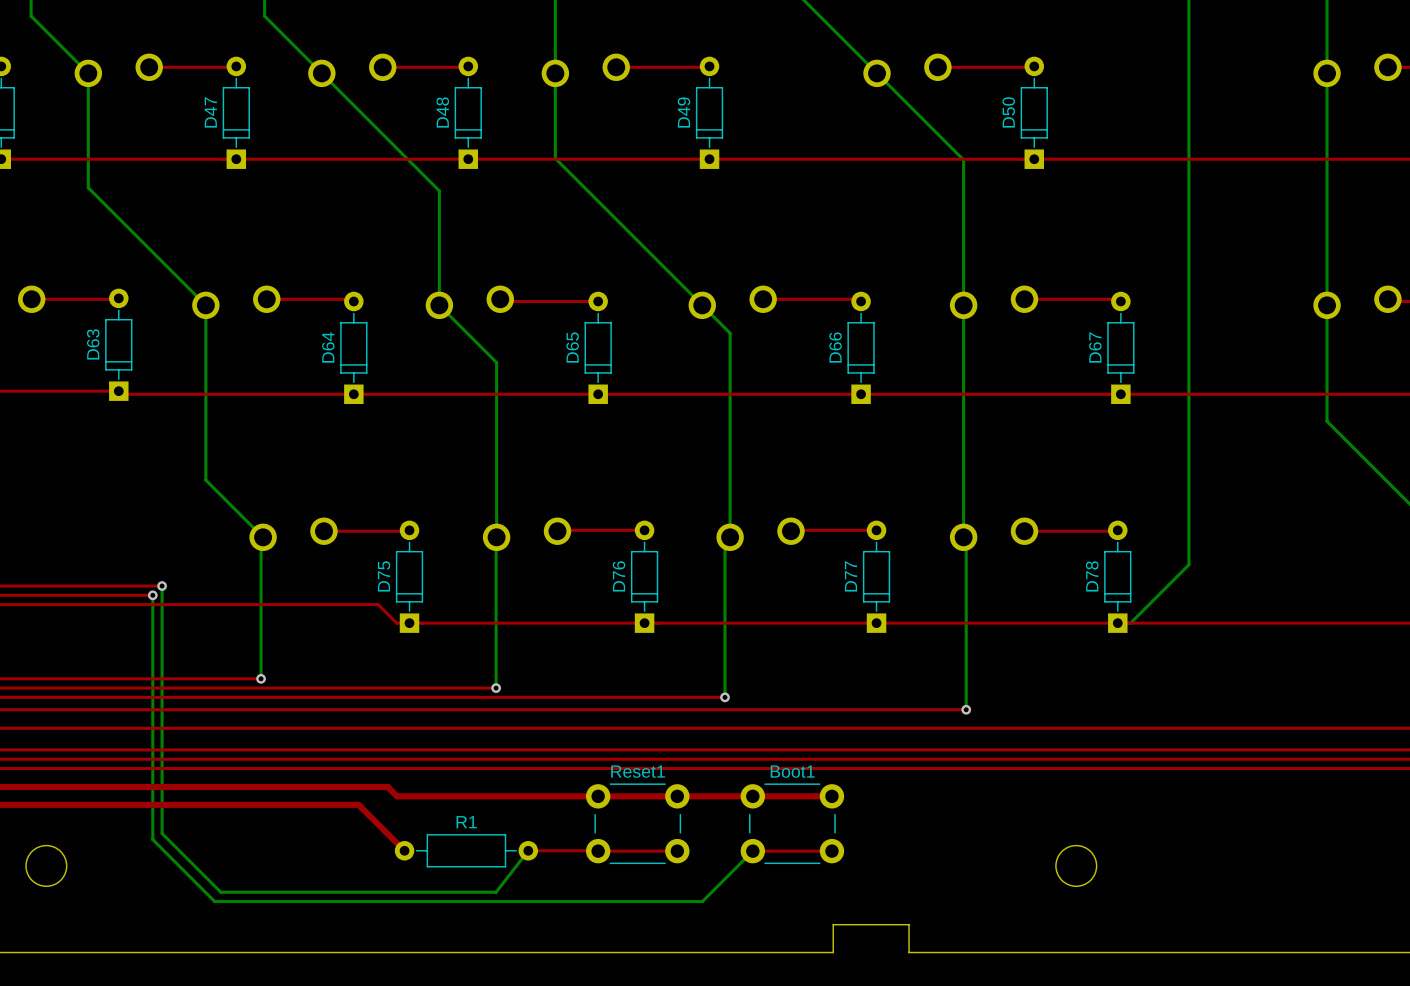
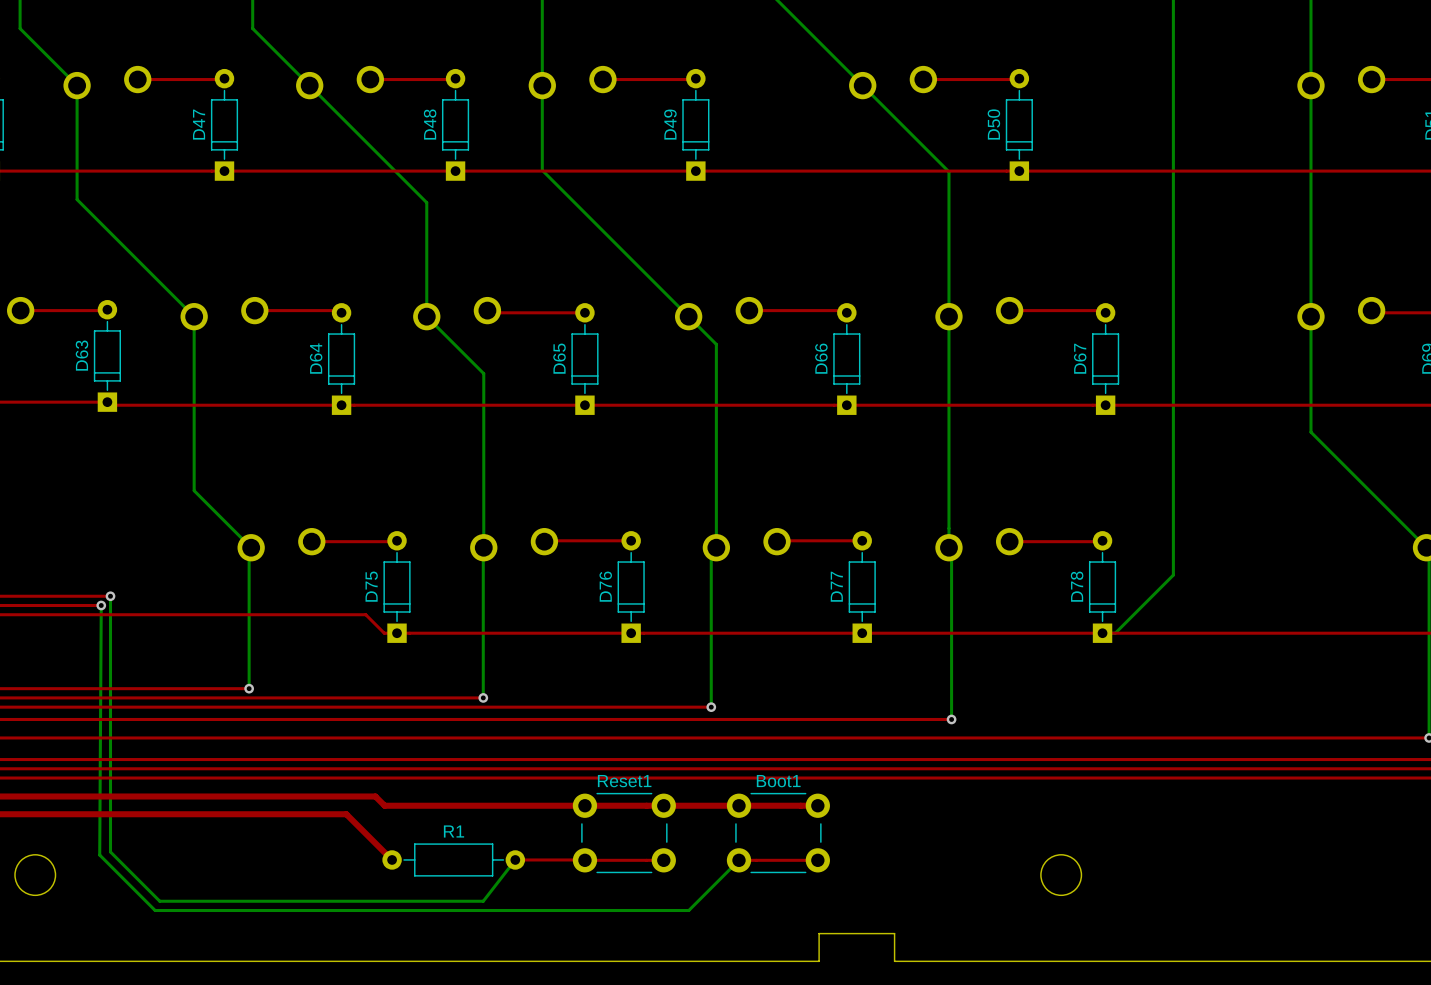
top track: (121, 586) (162, 586) -> none
via: none -> (110, 596)
bottom track: (162, 586) (162, 833) (220, 892) -> (110, 596) (110, 851) (159, 901) (209, 901)
via: (162, 586) -> none
top track: (112, 595) (152, 595) -> none
via: none -> (101, 605)
bottom track: (152, 595) (152, 839) (214, 901) -> (101, 605) (99, 855) (155, 910) (202, 910)
via: (152, 595) -> none

